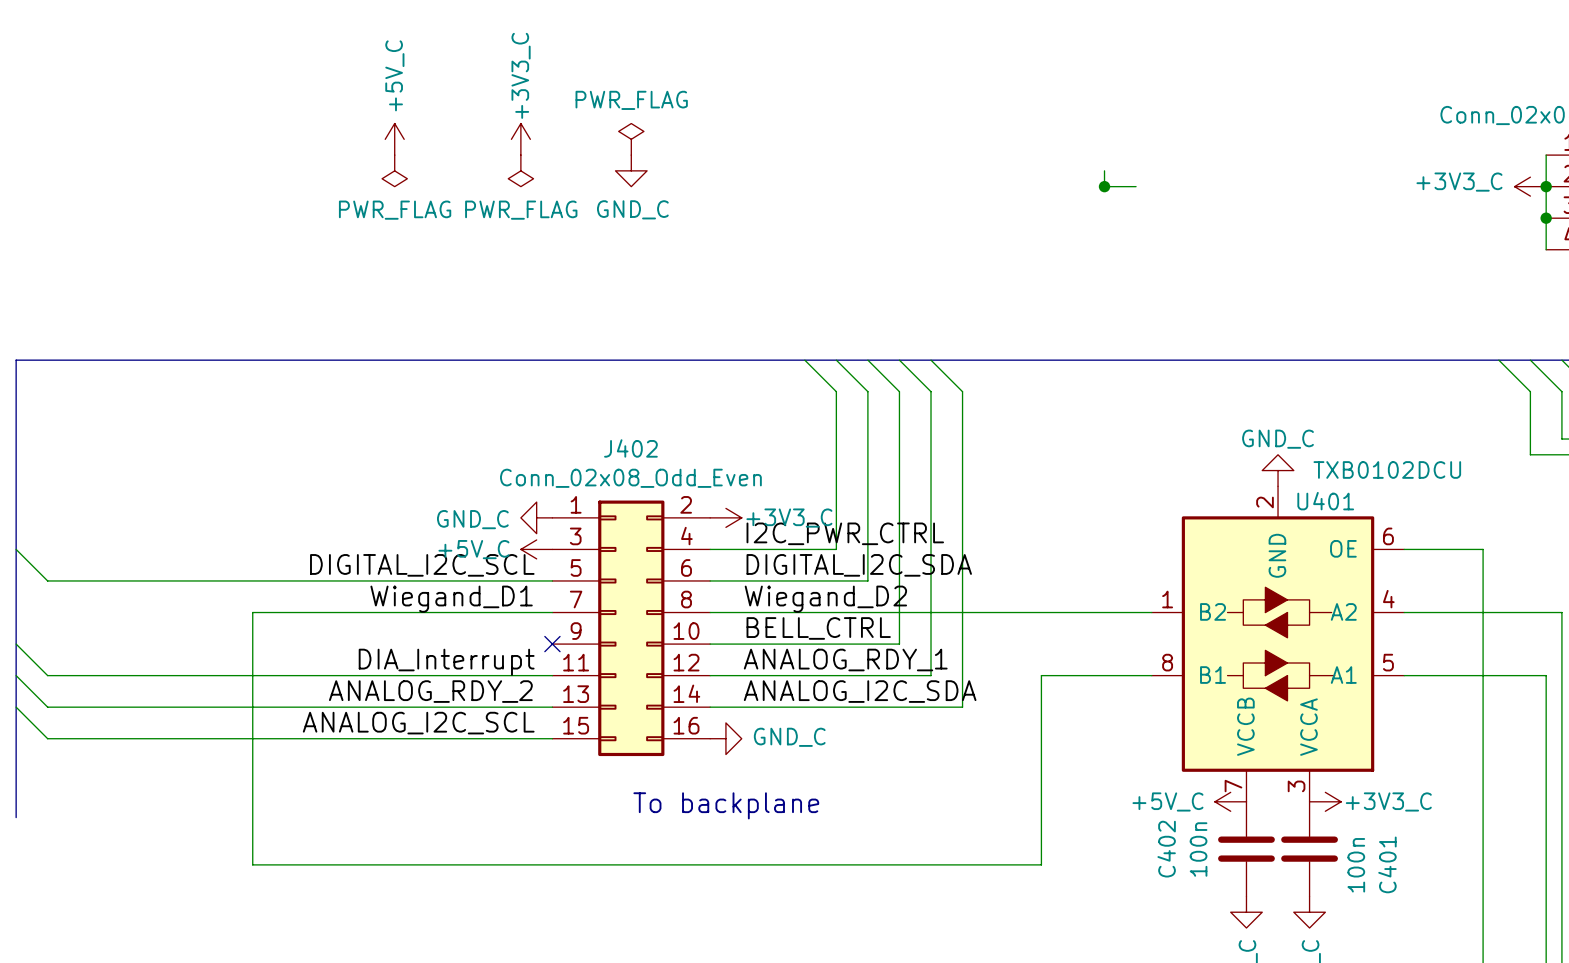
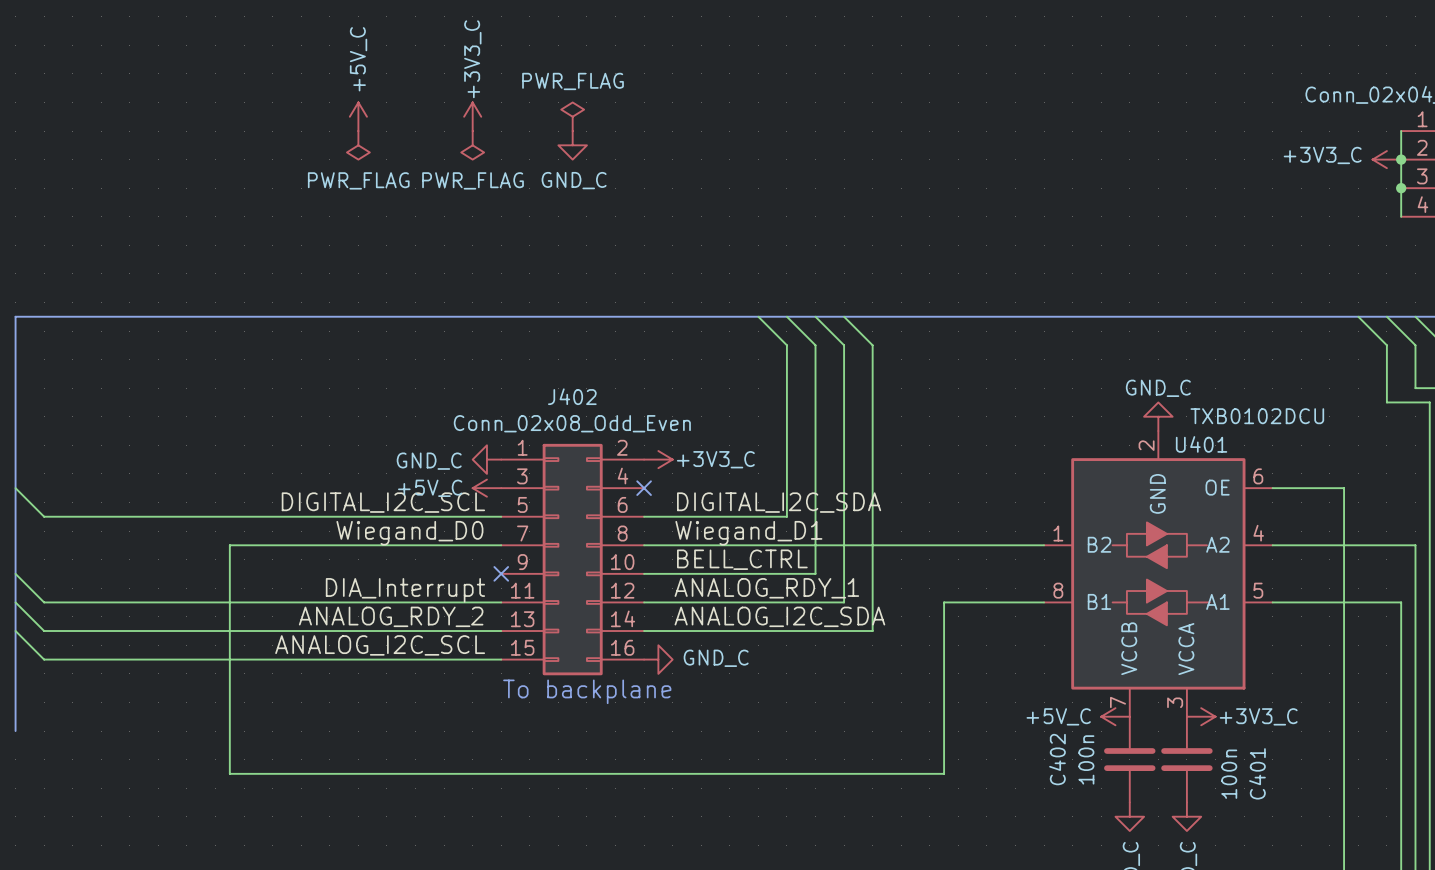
wire: (1104, 170) (1104, 186) (1136, 186) -> none
junction: (1104, 186) -> none
wire: (804, 360) (836, 391) (836, 549) (710, 549) -> none
label: I2C_PWR_CTRL (845, 533) -> none
no-connect mark: none -> (644, 488)
label: Wiegand_D1 (451, 599) -> Wiegand_D0 (409, 533)
label: Wiegand_D2 (825, 599) -> Wiegand_D1 (748, 533)
text position: To backplane (726, 805) -> To backplane (587, 691)

